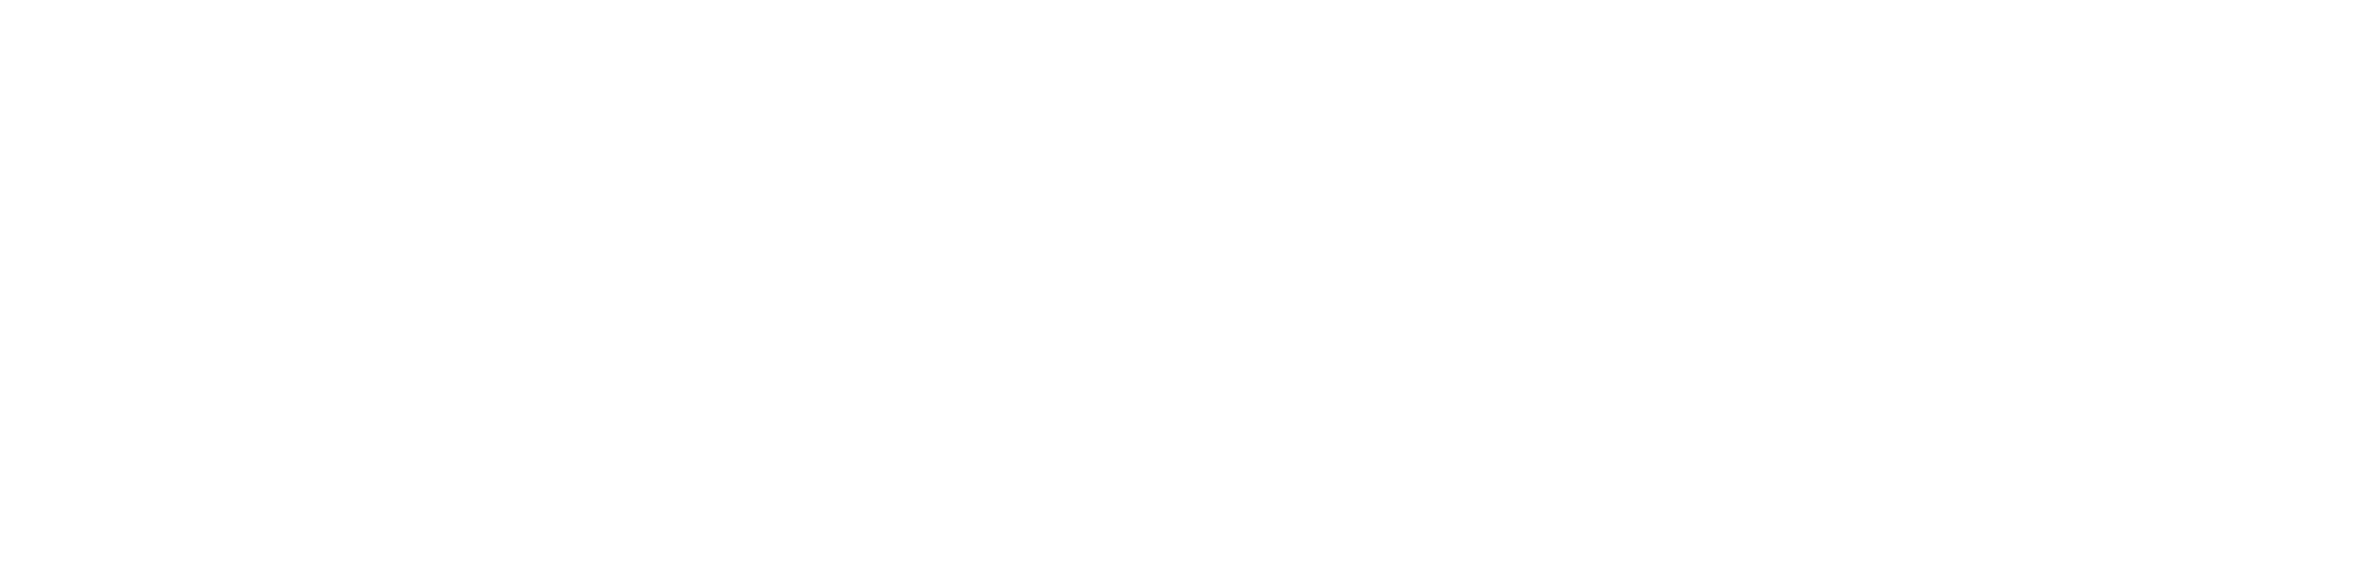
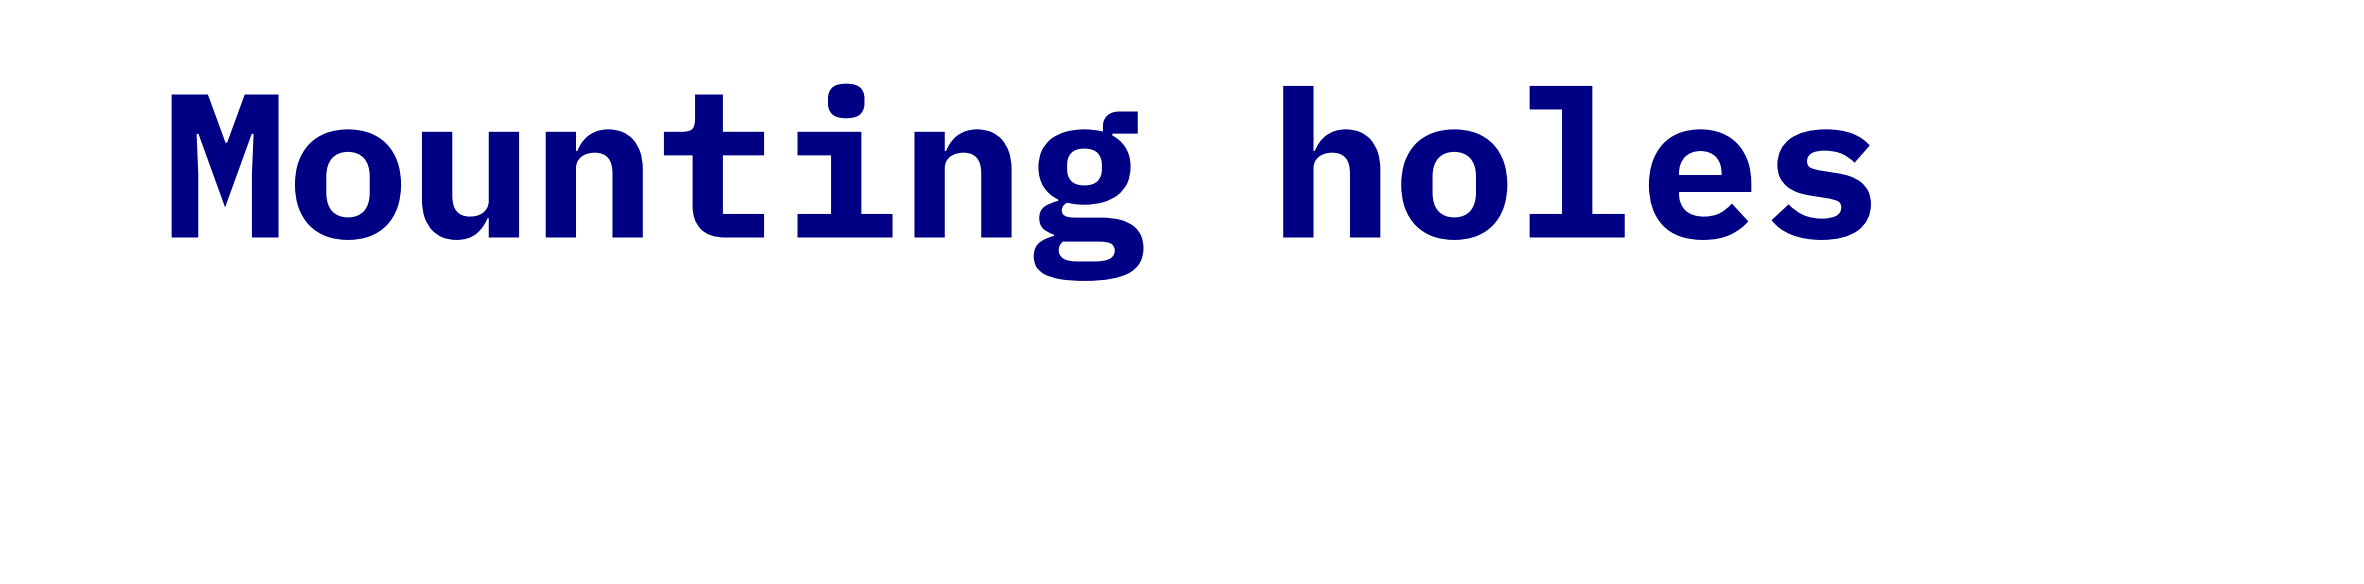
text: none -> Mounting holes (1021, 182)

